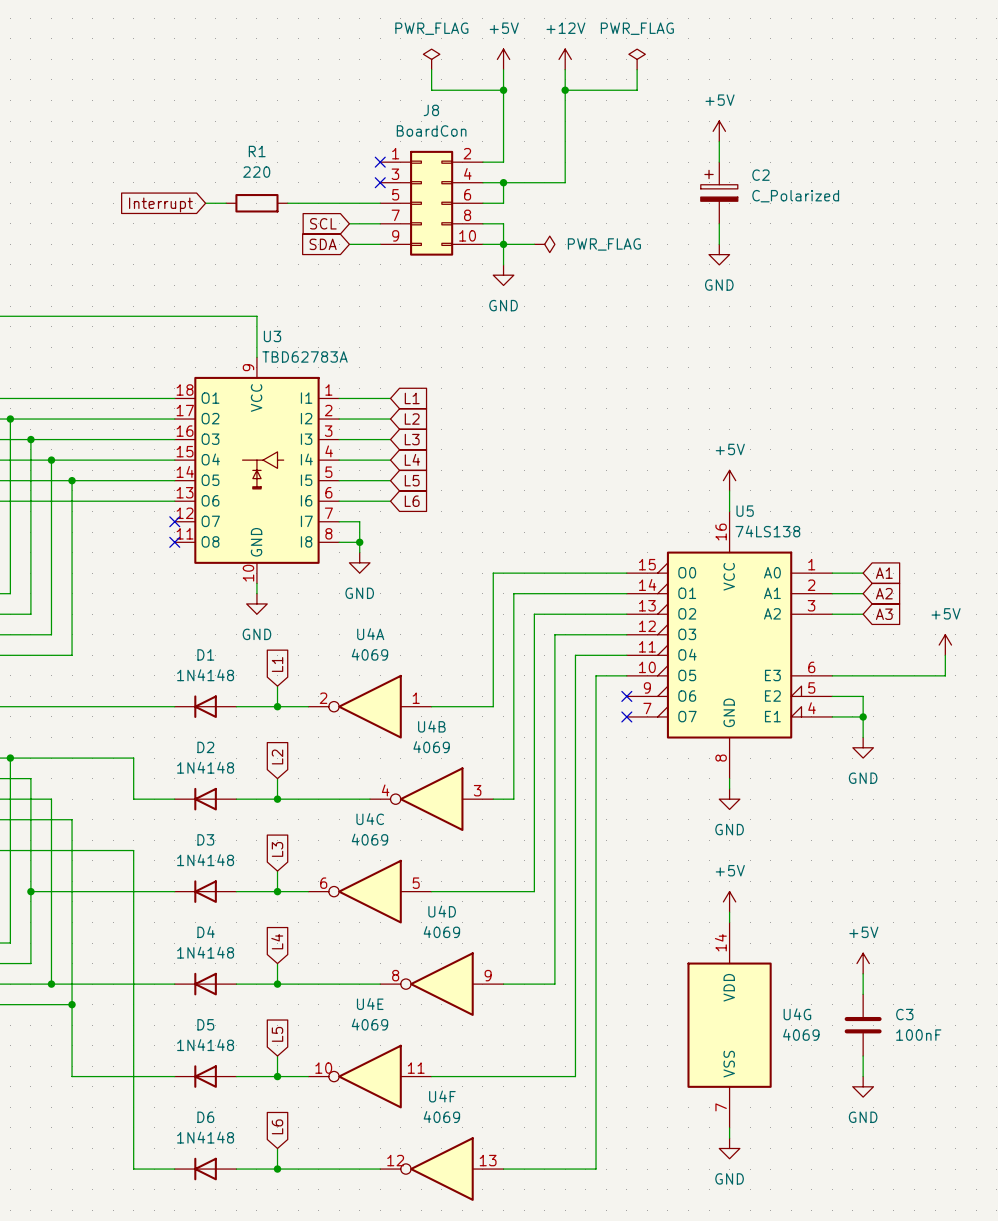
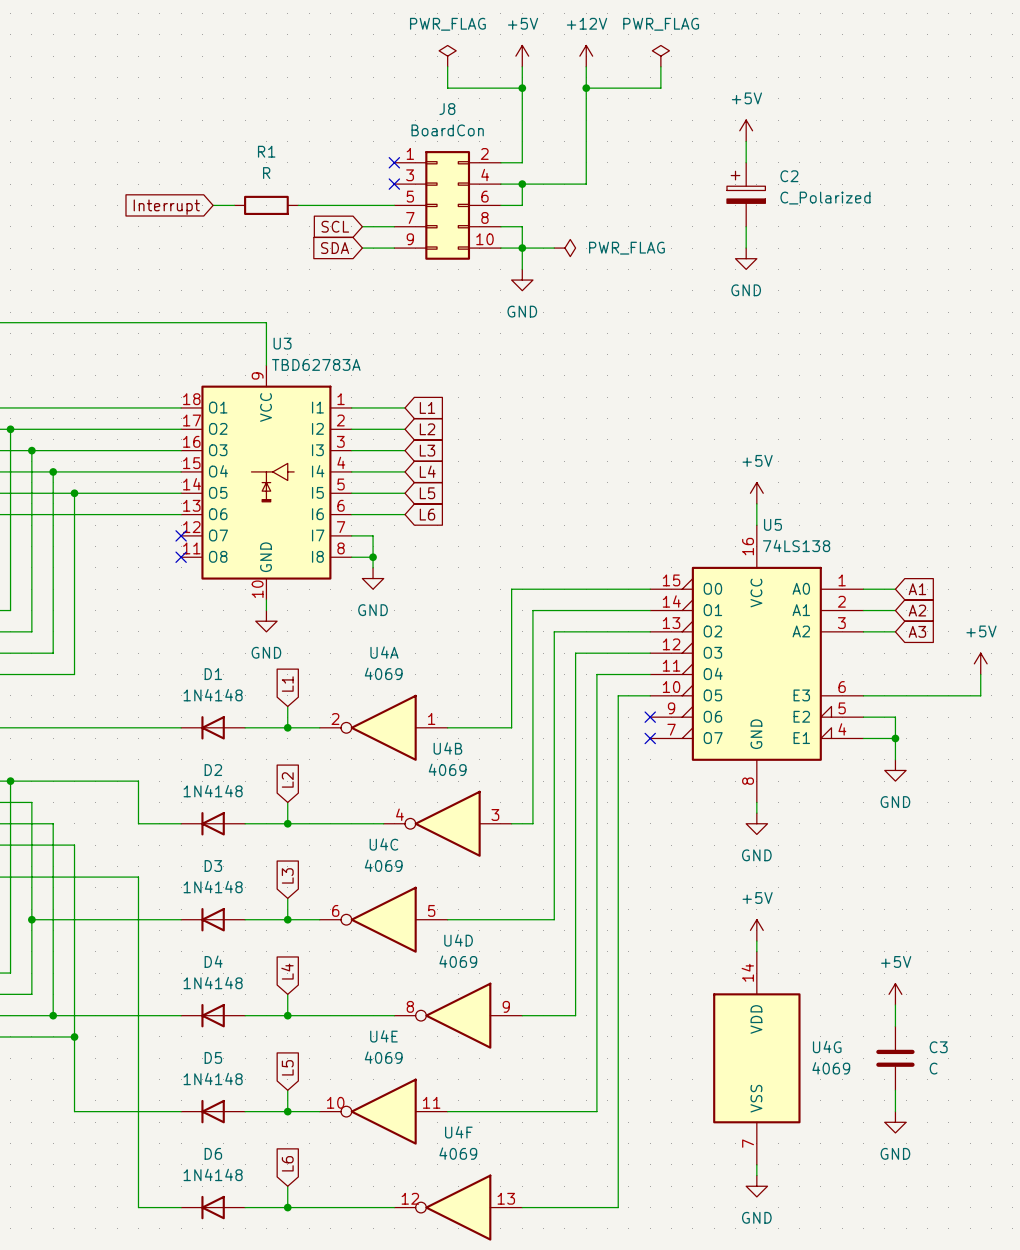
R1 value: 220 (256, 172) -> R (266, 173)
C3 value: 100nF (918, 1035) -> C (933, 1068)

